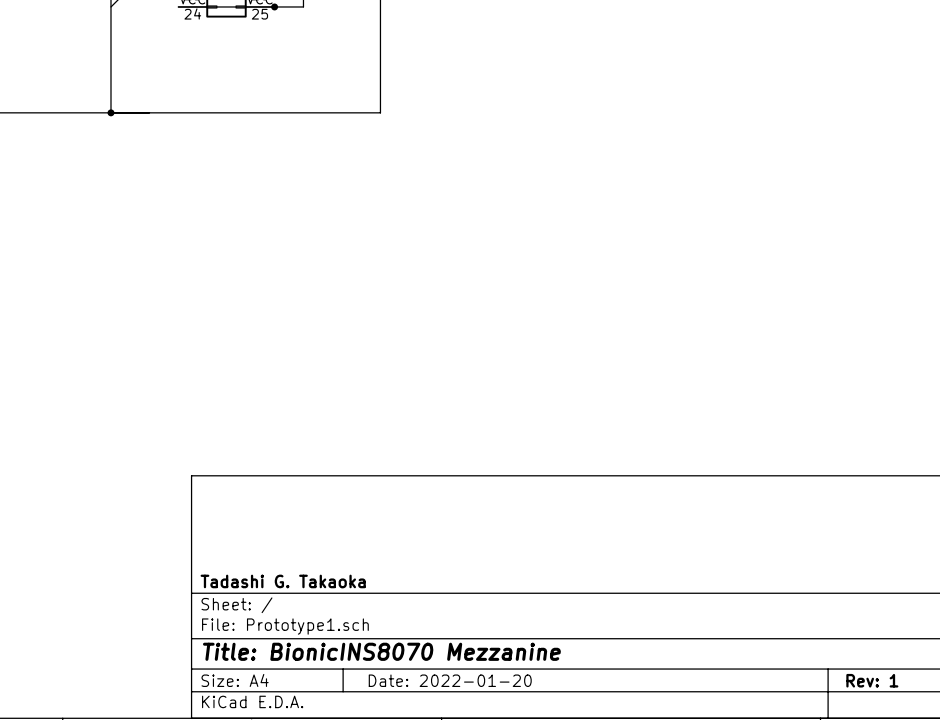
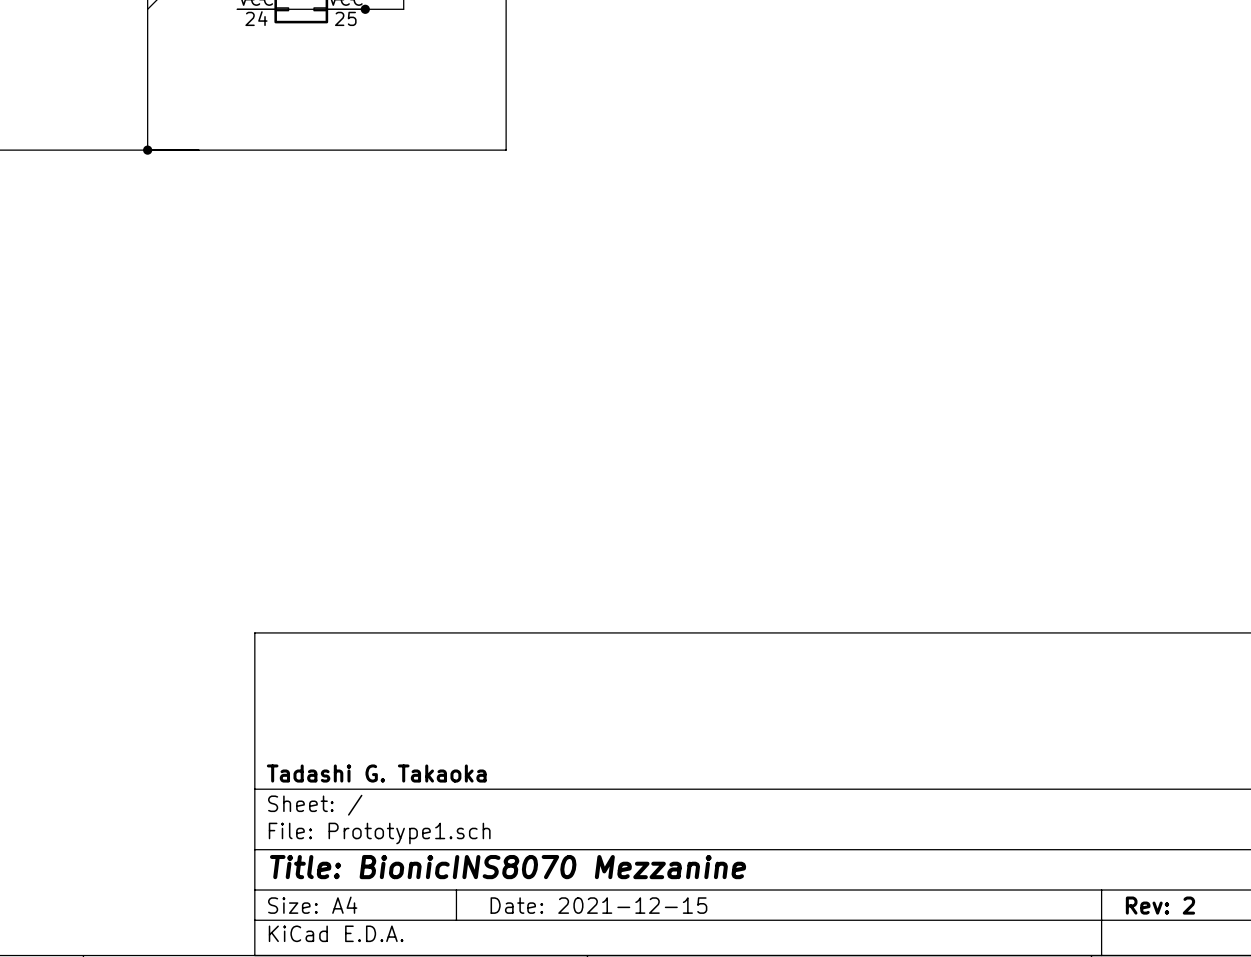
title block: Date: 2022-01-20 (450, 680) -> Date: 2021-12-15 (598, 905)
title block: Rev: 1 (872, 680) -> Rev: 2 (1160, 905)

